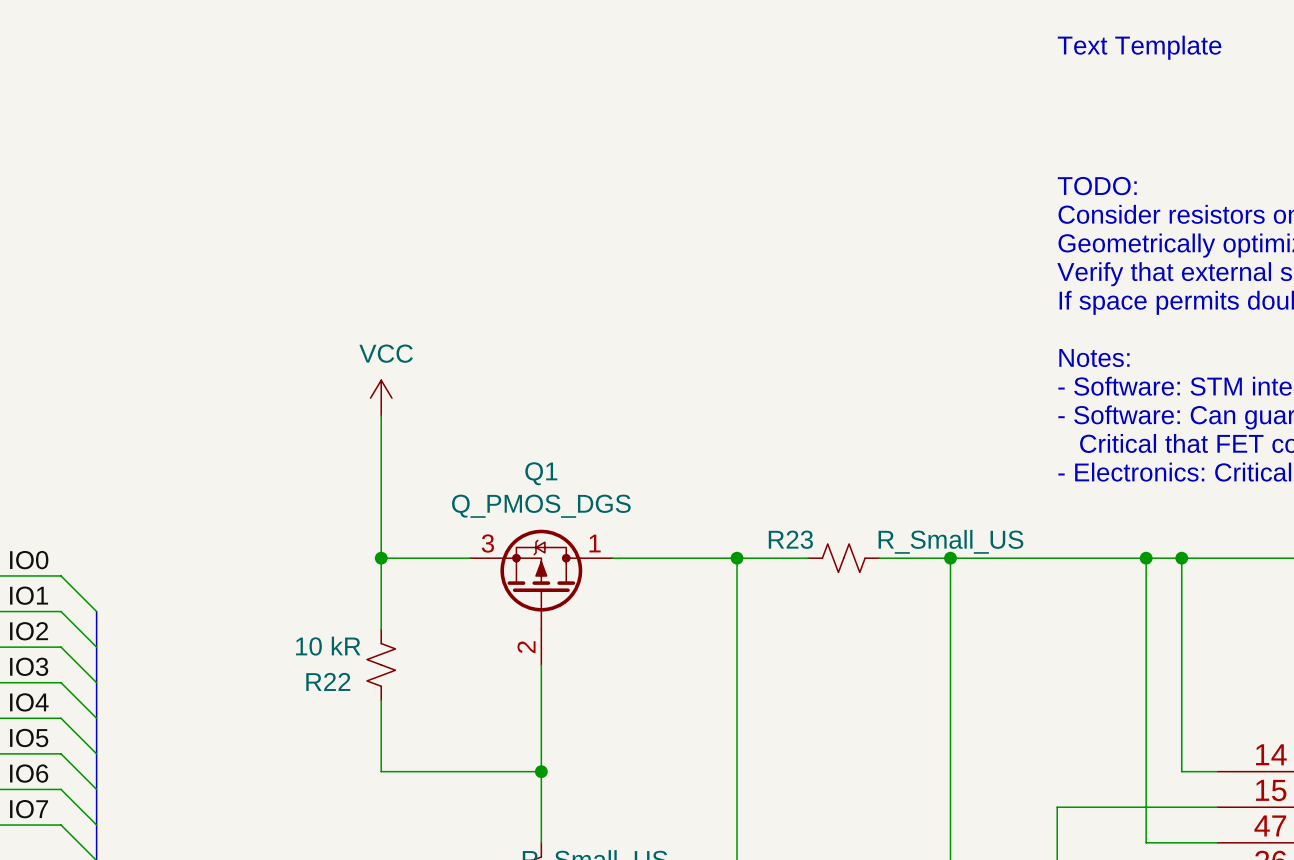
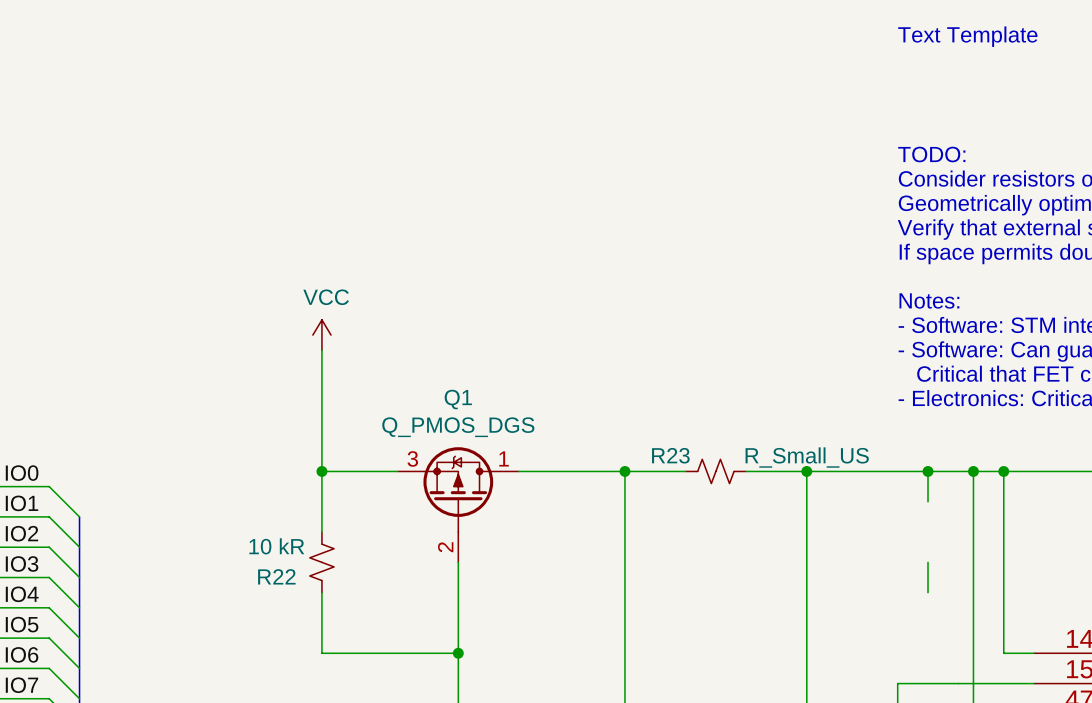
wire: none -> (928, 471) (928, 501)
junction: none -> (928, 471)
wire: none -> (928, 562) (928, 592)

